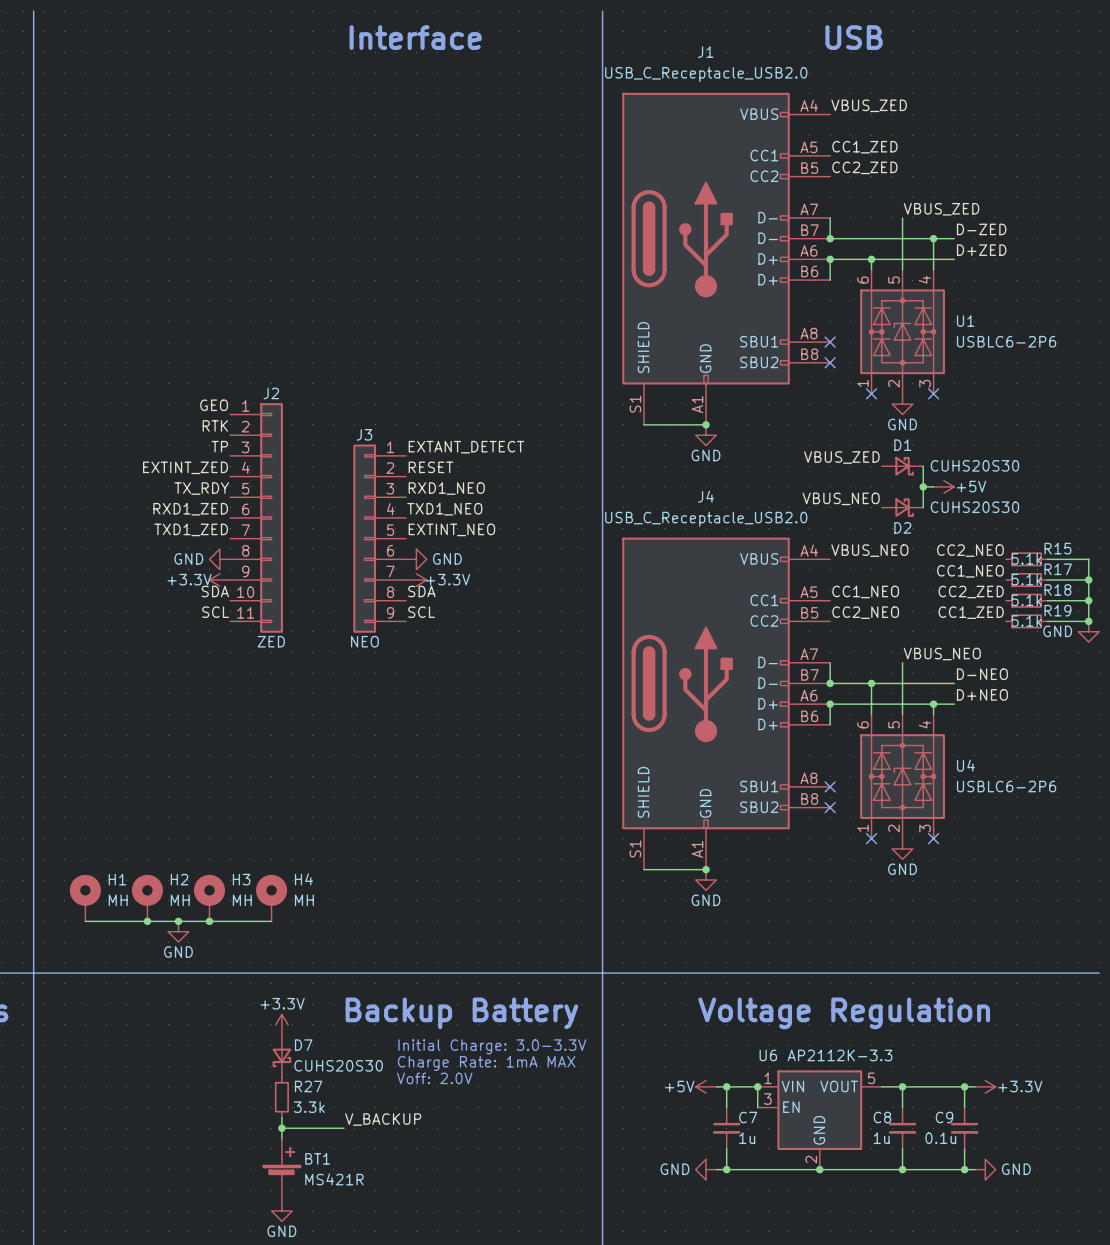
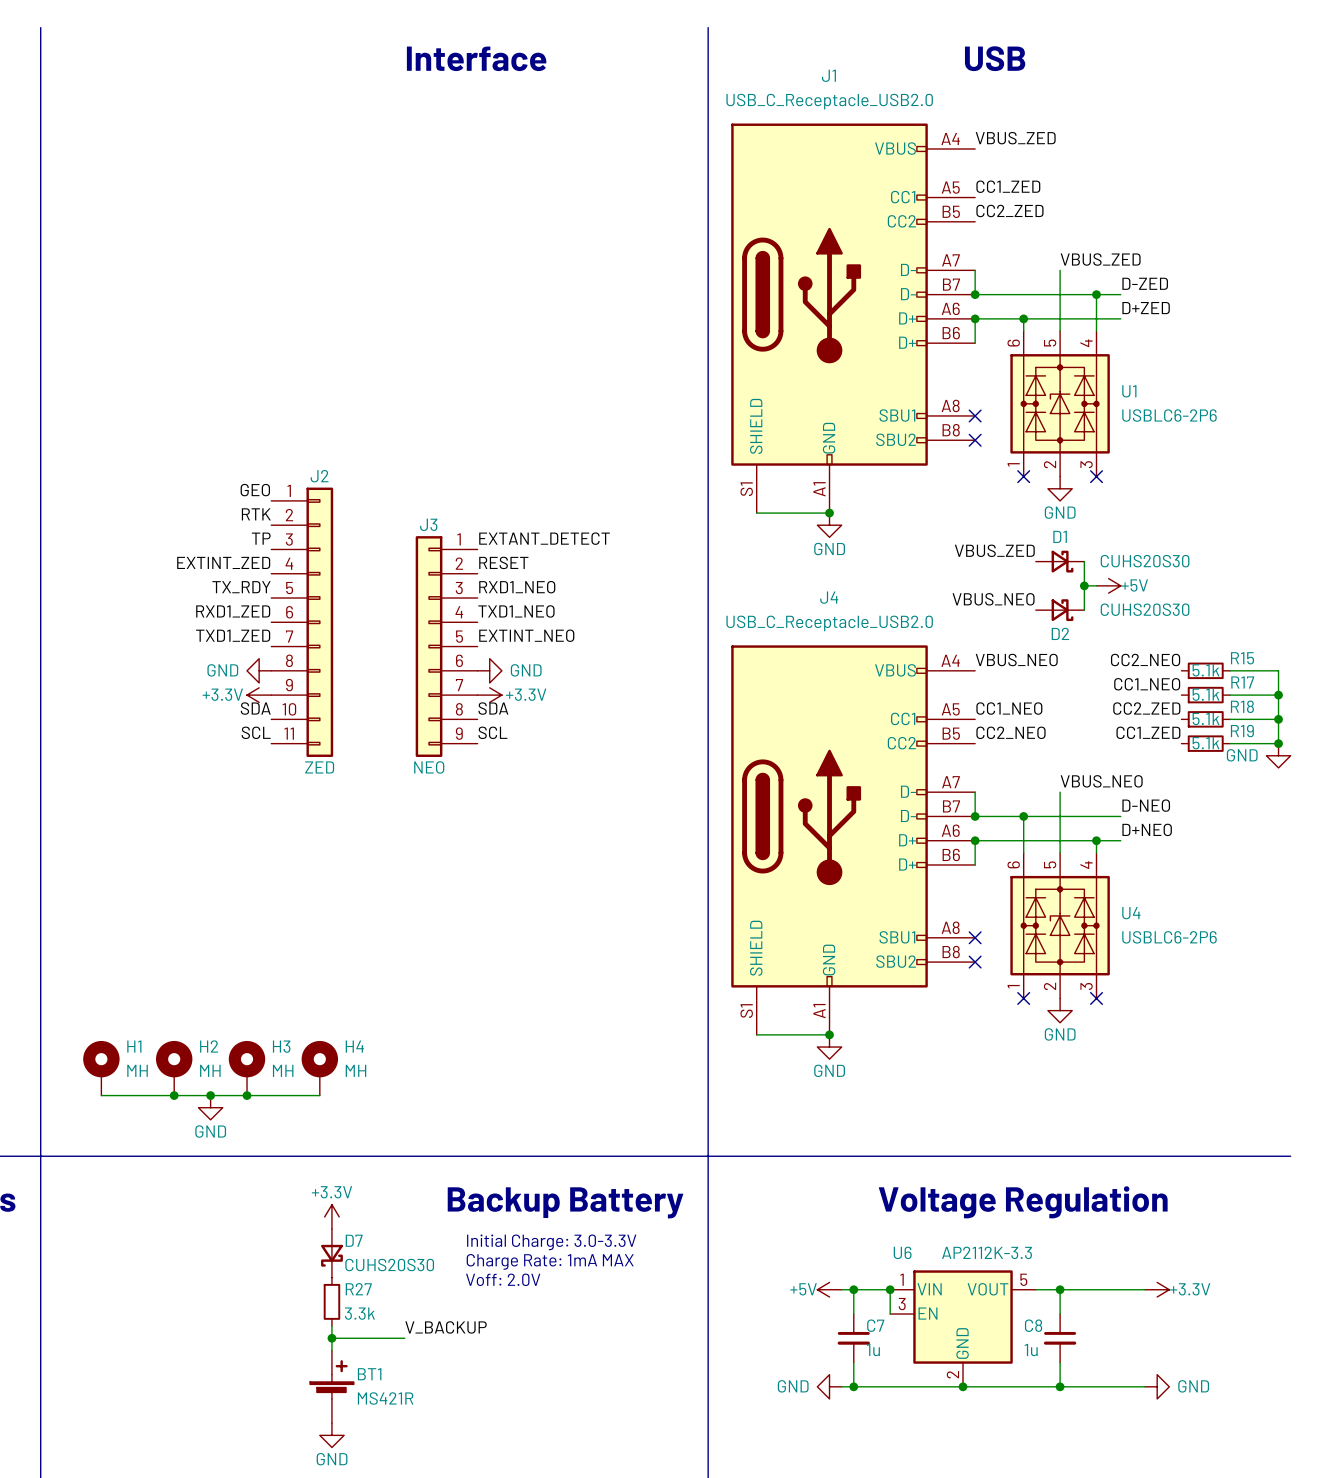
wire: (964, 1086) (964, 1107) -> none
junction: (964, 1086) -> none
C9: 0.1u (964, 1128) -> none
wire: (964, 1148) (964, 1169) -> none
junction: (964, 1169) -> none

